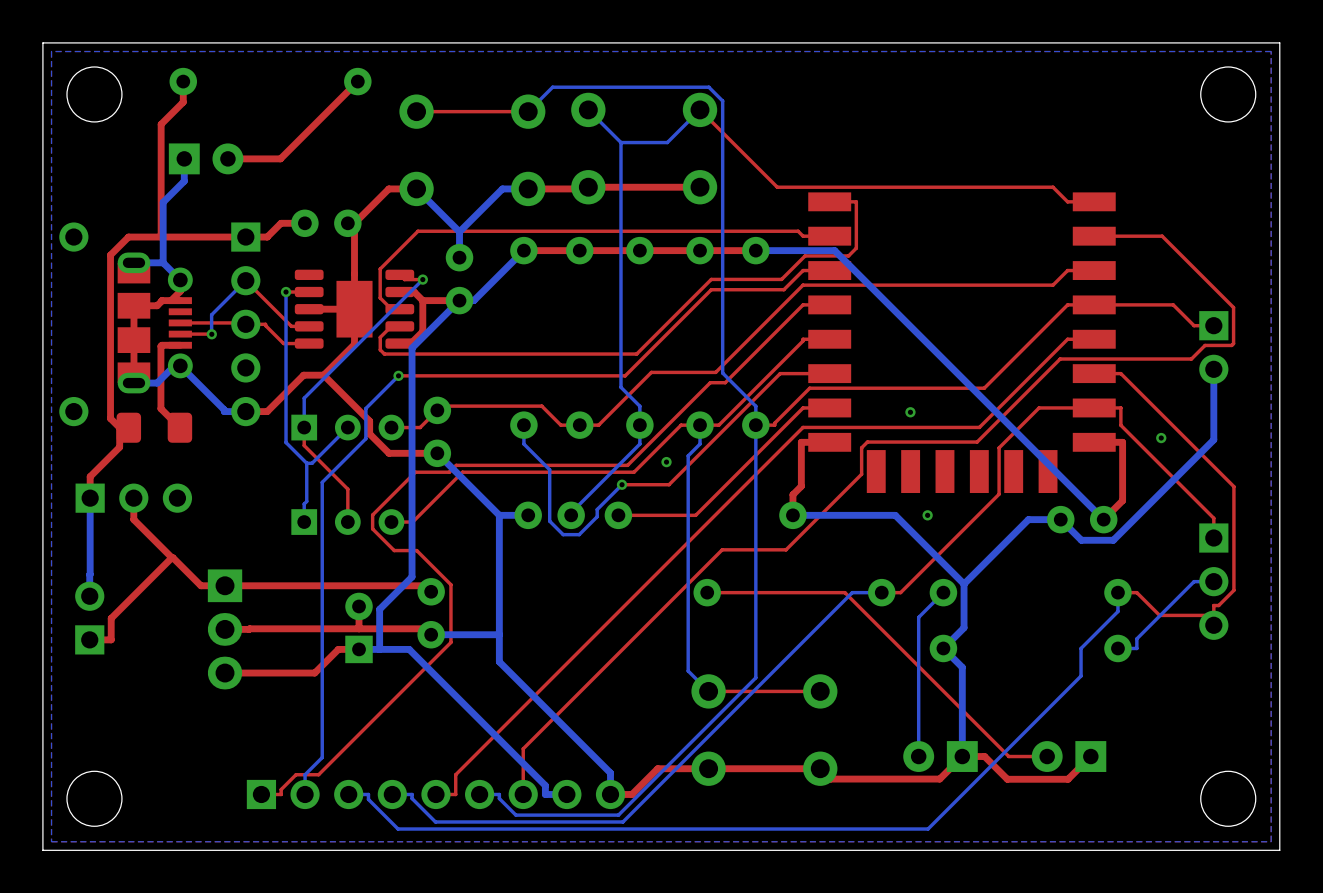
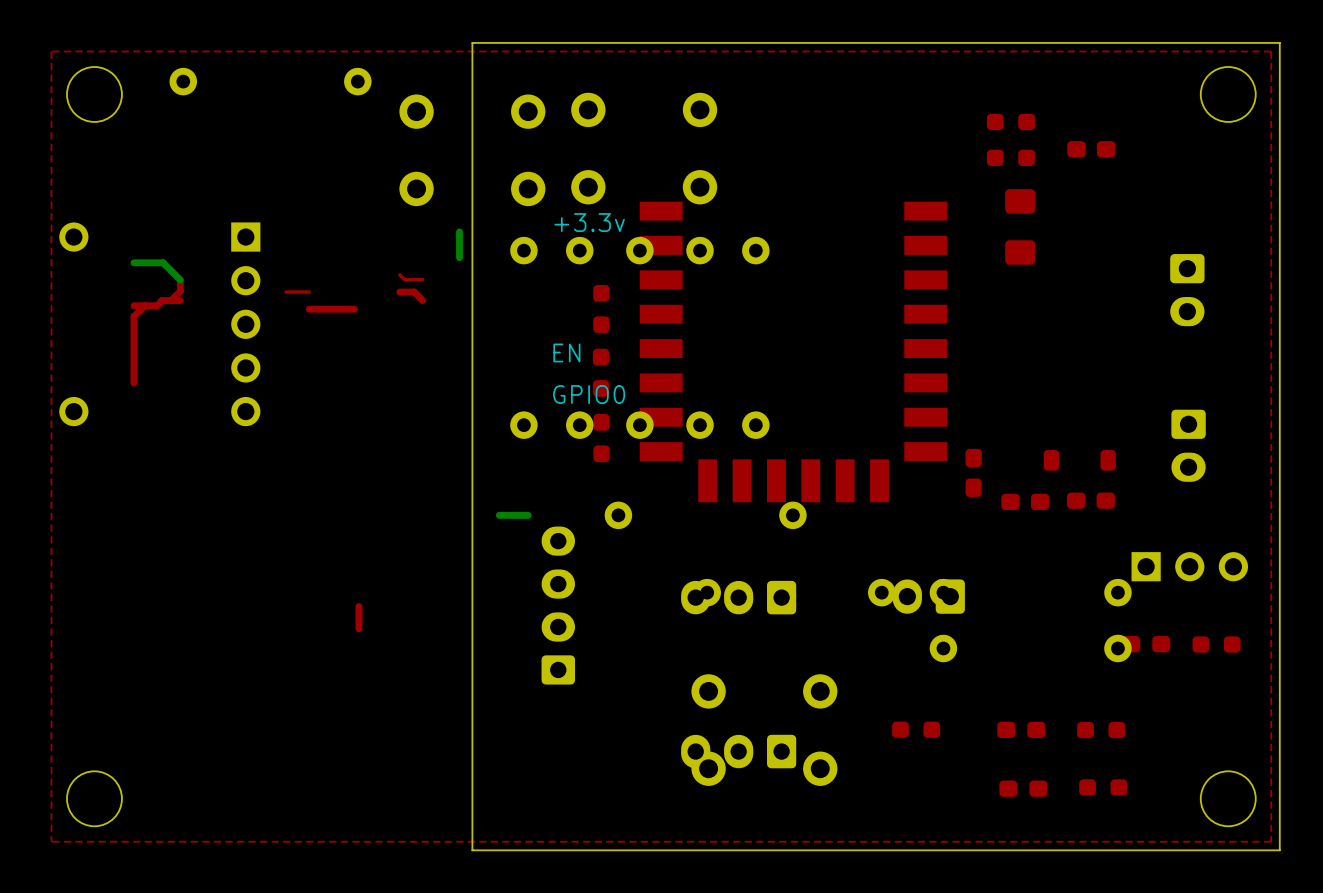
board edge: (472, 42) (42, 42) (42, 850) (472, 850) -> (472, 42) (472, 850)
bottom zone outline: (1271, 51) (51, 51) (51, 841) (1271, 841) (1271, 51) -> none
top track: (183, 81) (183, 102) (161, 124) (161, 237) -> none
top track: (357, 81) (280, 158) (227, 158) -> none
bottom track: (588, 109) (620, 142) -> none
top track: (700, 109) (777, 187) (1053, 187) (1067, 201) (1082, 201) -> none
bottom track: (700, 109) (667, 142) (620, 142) -> none
top track: (528, 111) (416, 111) -> none
bottom track: (528, 111) (552, 87) (708, 87) (722, 101) (722, 373) (755, 406) (755, 677) (618, 815) (515, 815) (499, 798) (499, 794) (479, 794) -> none
part: none -> (1010, 121)
bottom track: (620, 142) (620, 387) (639, 406) (639, 444) (571, 512) (571, 515) -> none
part: none -> (1091, 149)
part: none -> (1010, 157)
bottom track: (184, 158) (184, 181) (163, 202) (163, 262) -> none
part: (206, 158) -> none
top track: (700, 187) (528, 188) -> none
top track: (416, 188) (388, 188) (354, 223) -> none
bottom track: (528, 188) (502, 188) (459, 231) (416, 188) -> none
top track: (841, 201) (856, 201) (856, 248) (848, 255) (805, 255) (781, 279) (711, 279) (636, 354) (384, 354) (380, 349) (380, 337) (391, 326) (399, 326) -> none
text: none -> +3.3v (589, 222)
top track: (304, 223) (281, 223) (267, 237) (128, 237) (110, 255) (110, 418) (119, 427) -> none
part: (326, 223) -> none
top track: (354, 223) (354, 344) (323, 375) -> none
part: none -> (1020, 226)
top track: (841, 236) (803, 236) (798, 231) (417, 231) (380, 269) (380, 297) (391, 309) (399, 309) -> none
top track: (1082, 236) (1162, 236) (1233, 307) (1233, 343) (1231, 345) (1205, 345) (1191, 359) (1060, 359) (977, 442) (867, 442) (861, 447) (861, 474) (786, 549) (722, 549) (523, 748) (523, 794) -> none
bottom track: (523, 250) (473, 300) (459, 300) (412, 348) (412, 576) (379, 609) (379, 649) -> none
top track: (755, 250) (523, 250) -> none
bottom track: (755, 250) (834, 250) (1103, 519) -> none
top track: (841, 270) (803, 270) (783, 289) (711, 289) (625, 375) (398, 375) -> none
top track: (1082, 270) (1067, 270) (1053, 285) (803, 285) (715, 372) (651, 372) (598, 425) (560, 425) (541, 406) (441, 406) (420, 427) (391, 427) -> none
bottom track: (422, 279) (304, 398) (304, 427) -> none
via: (422, 279) -> none
part: (459, 279) -> none
bottom track: (245, 280) (211, 314) (211, 334) -> none
top track: (250, 285) (291, 326) (317, 326) -> none
part: none -> (1187, 290)
bottom track: (286, 292) (286, 442) (306, 463) -> none
via: (286, 292) -> none
top track: (459, 300) (422, 300) (422, 331) (410, 343) (399, 343) -> none
top track: (841, 304) (803, 304) (725, 382) (710, 382) (627, 465) (456, 465) (449, 472) (415, 472) (372, 514) (372, 528) (394, 550) (416, 550) (450, 584) (450, 642) (318, 774) (296, 774) (281, 789) (281, 794) (261, 794) -> none
part: (354, 309) -> none
part: none -> (601, 309)
top track: (240, 319) (237, 322) (180, 322) -> none
part: (155, 322) -> none
top track: (245, 324) (265, 324) (283, 343) (309, 343) -> none
top track: (1213, 325) (1194, 325) (1173, 304) (1067, 304) (984, 388) (809, 388) (774, 425) (755, 425) -> none
top track: (211, 334) (180, 334) -> none
via: (211, 334) -> none
top track: (841, 339) (803, 339) (718, 425) (681, 425) (634, 472) (462, 472) (412, 522) (391, 522) -> none
top track: (1082, 339) (1067, 339) (979, 427) (803, 427) (455, 774) (455, 794) (435, 794) -> none
part position: (961, 342) -> (793, 351)
top track: (180, 345) (160, 346) (160, 408) (179, 427) -> none
part: (1213, 347) -> none
text: none -> EN (566, 352)
bottom track: (1213, 369) (1213, 439) (1113, 540) (1081, 540) (1060, 519) (1028, 519) (964, 584) -> none
part: none -> (601, 372)
top track: (841, 373) (780, 373) (669, 484) (622, 484) -> none
top track: (1082, 373) (1120, 373) (1233, 486) (1233, 590) (1218, 605) (1213, 605) (1213, 625) -> none
top track: (323, 375) (369, 421) (369, 433) (389, 453) (437, 453) -> none
top track: (323, 375) (303, 375) (267, 411) (245, 411) -> none
bottom track: (398, 375) (365, 408) (365, 438) (322, 482) (322, 757) (305, 774) (305, 794) -> none
via: (398, 375) -> none
bottom track: (133, 383) (157, 383) (174, 365) (180, 365) (224, 411) (245, 411) -> none
text: none -> GPIO0 (589, 394)
top track: (841, 407) (803, 407) (695, 515) (618, 515) -> none
via: (910, 412) -> none
bottom track: (523, 425) (523, 444) (549, 469) (549, 521) (563, 534) (579, 534) (597, 516) (597, 509) (622, 484) -> none
bottom track: (700, 425) (700, 444) (688, 455) (688, 671) (708, 691) -> none
top track: (119, 427) (119, 447) (90, 476) (90, 498) -> none
part: (154, 427) -> none
top track: (304, 427) (304, 445) (347, 489) (347, 522) -> none
bottom track: (347, 427) (312, 463) (306, 463) -> none
part: (347, 427) -> none
part: (437, 431) -> none
part: none -> (601, 438)
via: (1161, 438) -> none
top track: (841, 442) (801, 442) (801, 486) (792, 494) (792, 515) -> none
top track: (1082, 442) (1122, 442) (1122, 500) (1103, 519) -> none
part: none -> (1188, 445)
bottom track: (437, 453) (499, 515) (499, 661) (610, 773) (610, 794) -> none
part: none -> (1079, 460)
via: (666, 462) -> none
bottom track: (306, 463) (306, 501) (304, 504) (304, 522) -> none
part: none -> (973, 472)
via: (622, 484) -> none
bottom track: (90, 498) (89, 596) -> none
top track: (133, 498) (133, 519) (171, 557) -> none
part: (133, 498) -> none
part: none -> (1090, 500)
part: none -> (1025, 501)
part: (549, 515) -> none
bottom track: (792, 515) (895, 515) (964, 584) -> none
via: (927, 515) -> none
part: (1082, 519) -> none
part: (347, 522) -> none
top track: (1213, 538) (1213, 518) (1120, 425) (1120, 407) (1039, 407) (999, 447) (999, 494) (900, 592) (881, 592) -> none
top track: (171, 557) (200, 585) (425, 585) (431, 591) -> none
top track: (171, 557) (111, 618) (111, 639) (89, 639) -> none
bottom track: (1213, 581) (1194, 581) (1136, 638) (1136, 648) (1117, 648) -> none
part rotation: 0° (1213, 581) -> 90° counterclockwise (1189, 566)
bottom track: (964, 584) (964, 627) (943, 648) (962, 667) (962, 756) -> none
top track: (707, 592) (844, 592) (1008, 756) (1047, 756) -> none
bottom track: (881, 592) (852, 592) (622, 821) (435, 821) (412, 798) (412, 794) (392, 794) -> none
bottom track: (943, 592) (918, 617) (918, 756) -> none
top track: (1117, 592) (1136, 592) (1159, 615) (1213, 615) -> none
bottom track: (1117, 592) (1117, 611) (1081, 648) (1081, 676) (928, 829) (398, 829) (368, 799) (368, 794) (348, 794) -> none
part: none -> (928, 596)
part: none -> (738, 597)
part: none -> (558, 605)
part: (431, 613) -> none
part: (89, 618) -> none
part: (359, 627) -> none
top track: (225, 629) (425, 628) (431, 634) -> none
part: (225, 629) -> none
bottom track: (499, 634) (431, 634) -> none
part: none -> (1146, 644)
part: none -> (1216, 644)
top track: (359, 649) (338, 649) (314, 673) (225, 673) -> none
bottom track: (359, 649) (409, 649) (545, 785) (545, 794) (566, 794) -> none
top track: (820, 691) (708, 691) -> none
part: none -> (916, 729)
part: none -> (1021, 729)
part: none -> (1101, 730)
part: none -> (738, 751)
part: (940, 756) -> none
part: (1069, 756) -> none
top track: (1090, 756) (1068, 779) (1007, 779) (984, 756) (962, 756) (939, 779) (830, 779) (820, 768) (657, 768) (631, 794) (610, 794) -> none
part: none -> (1103, 787)
part: none -> (1023, 788)
part: (435, 794) -> none

